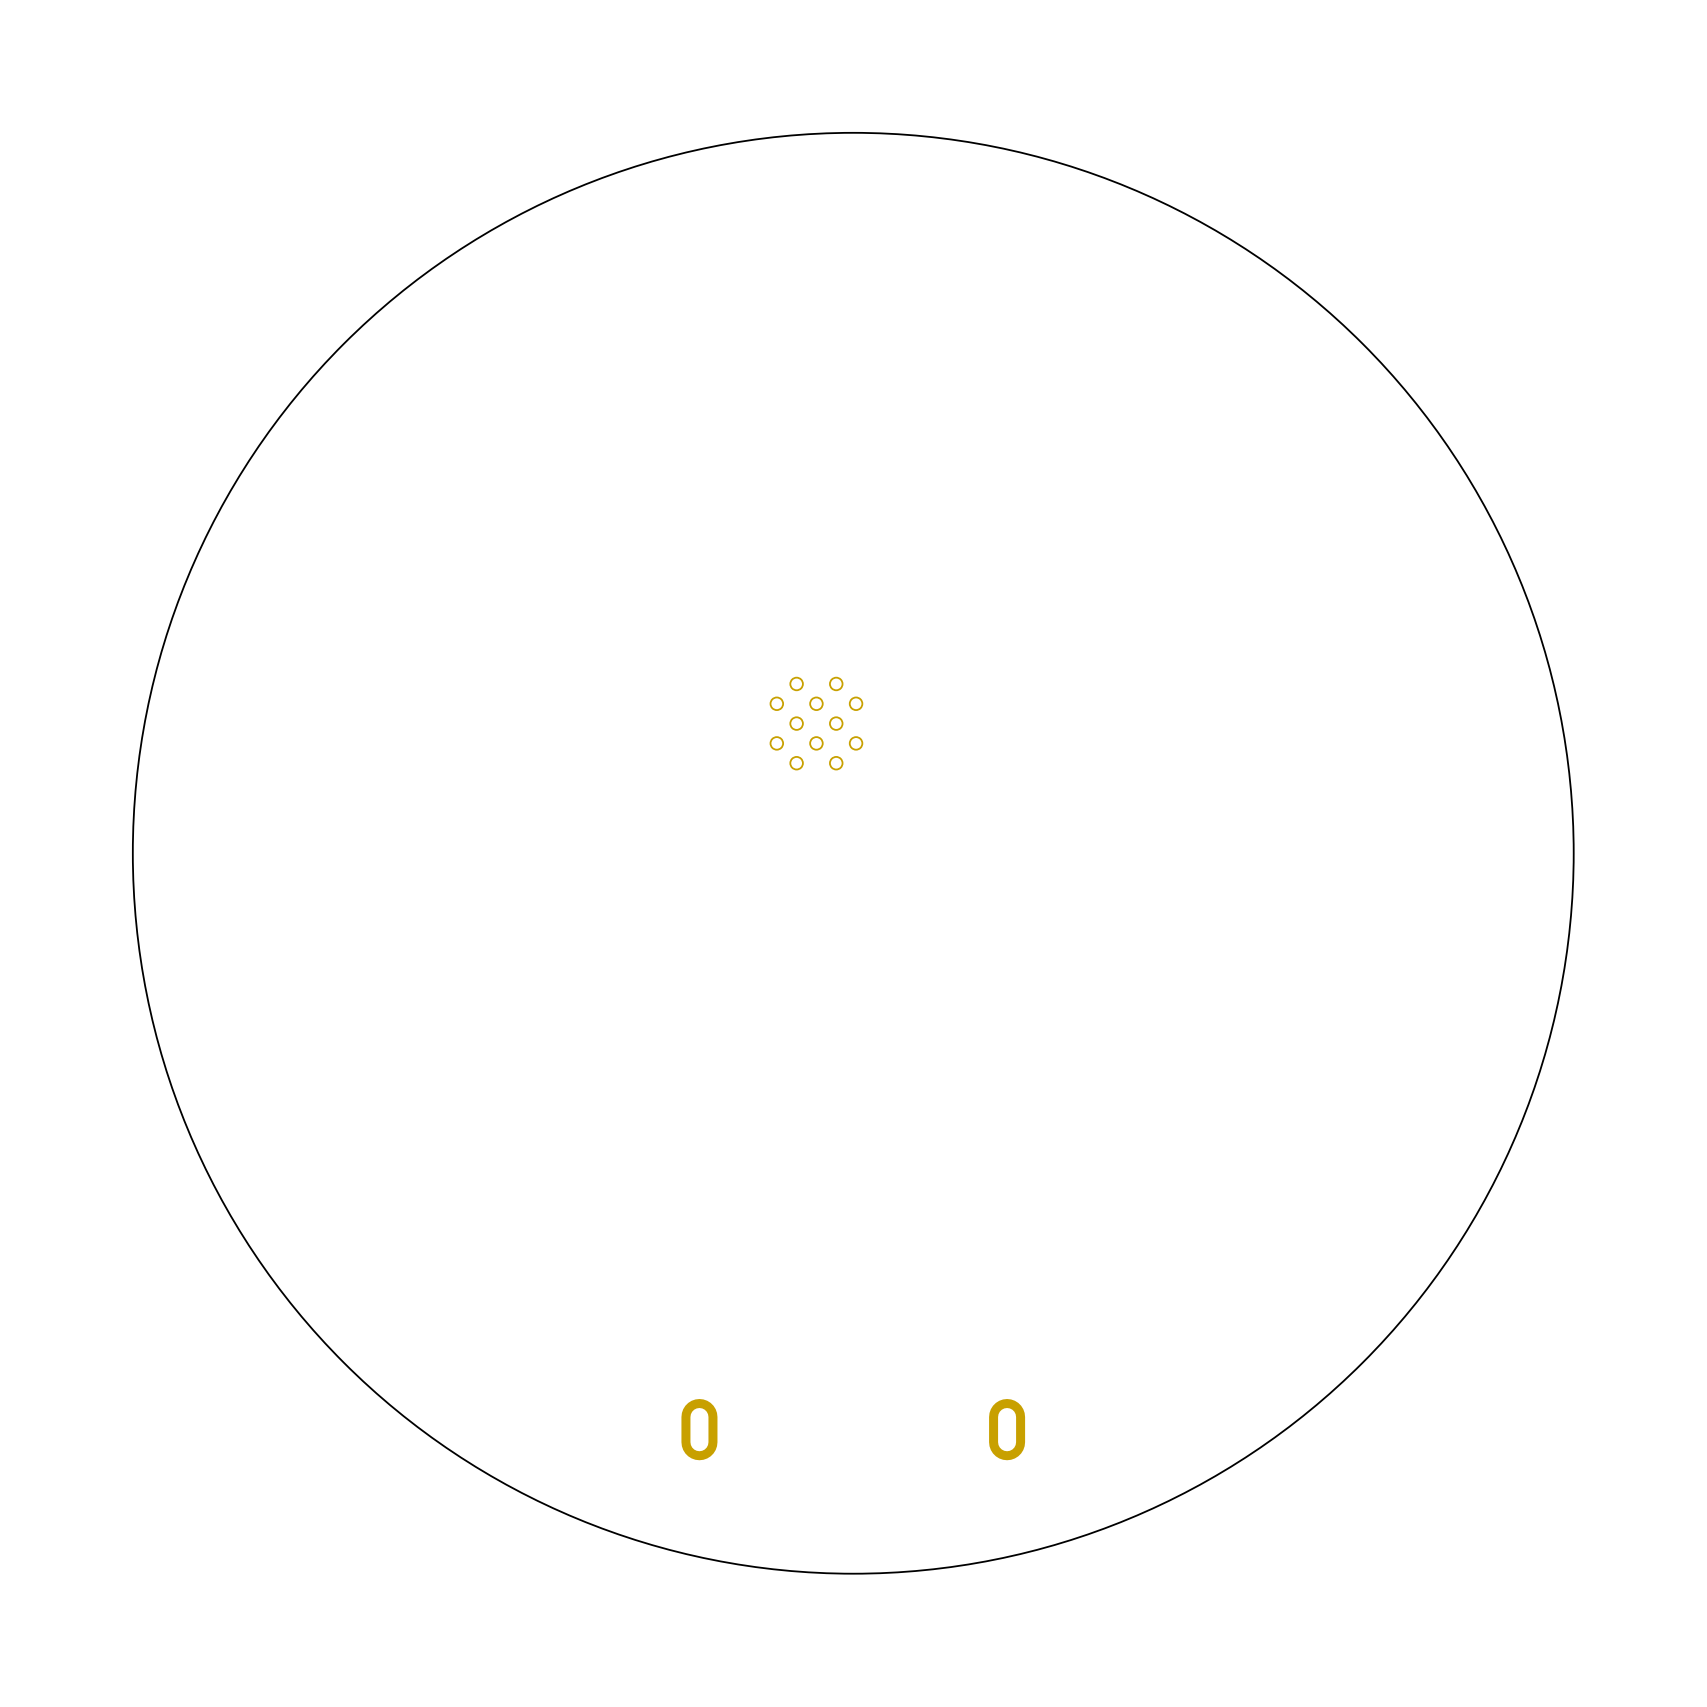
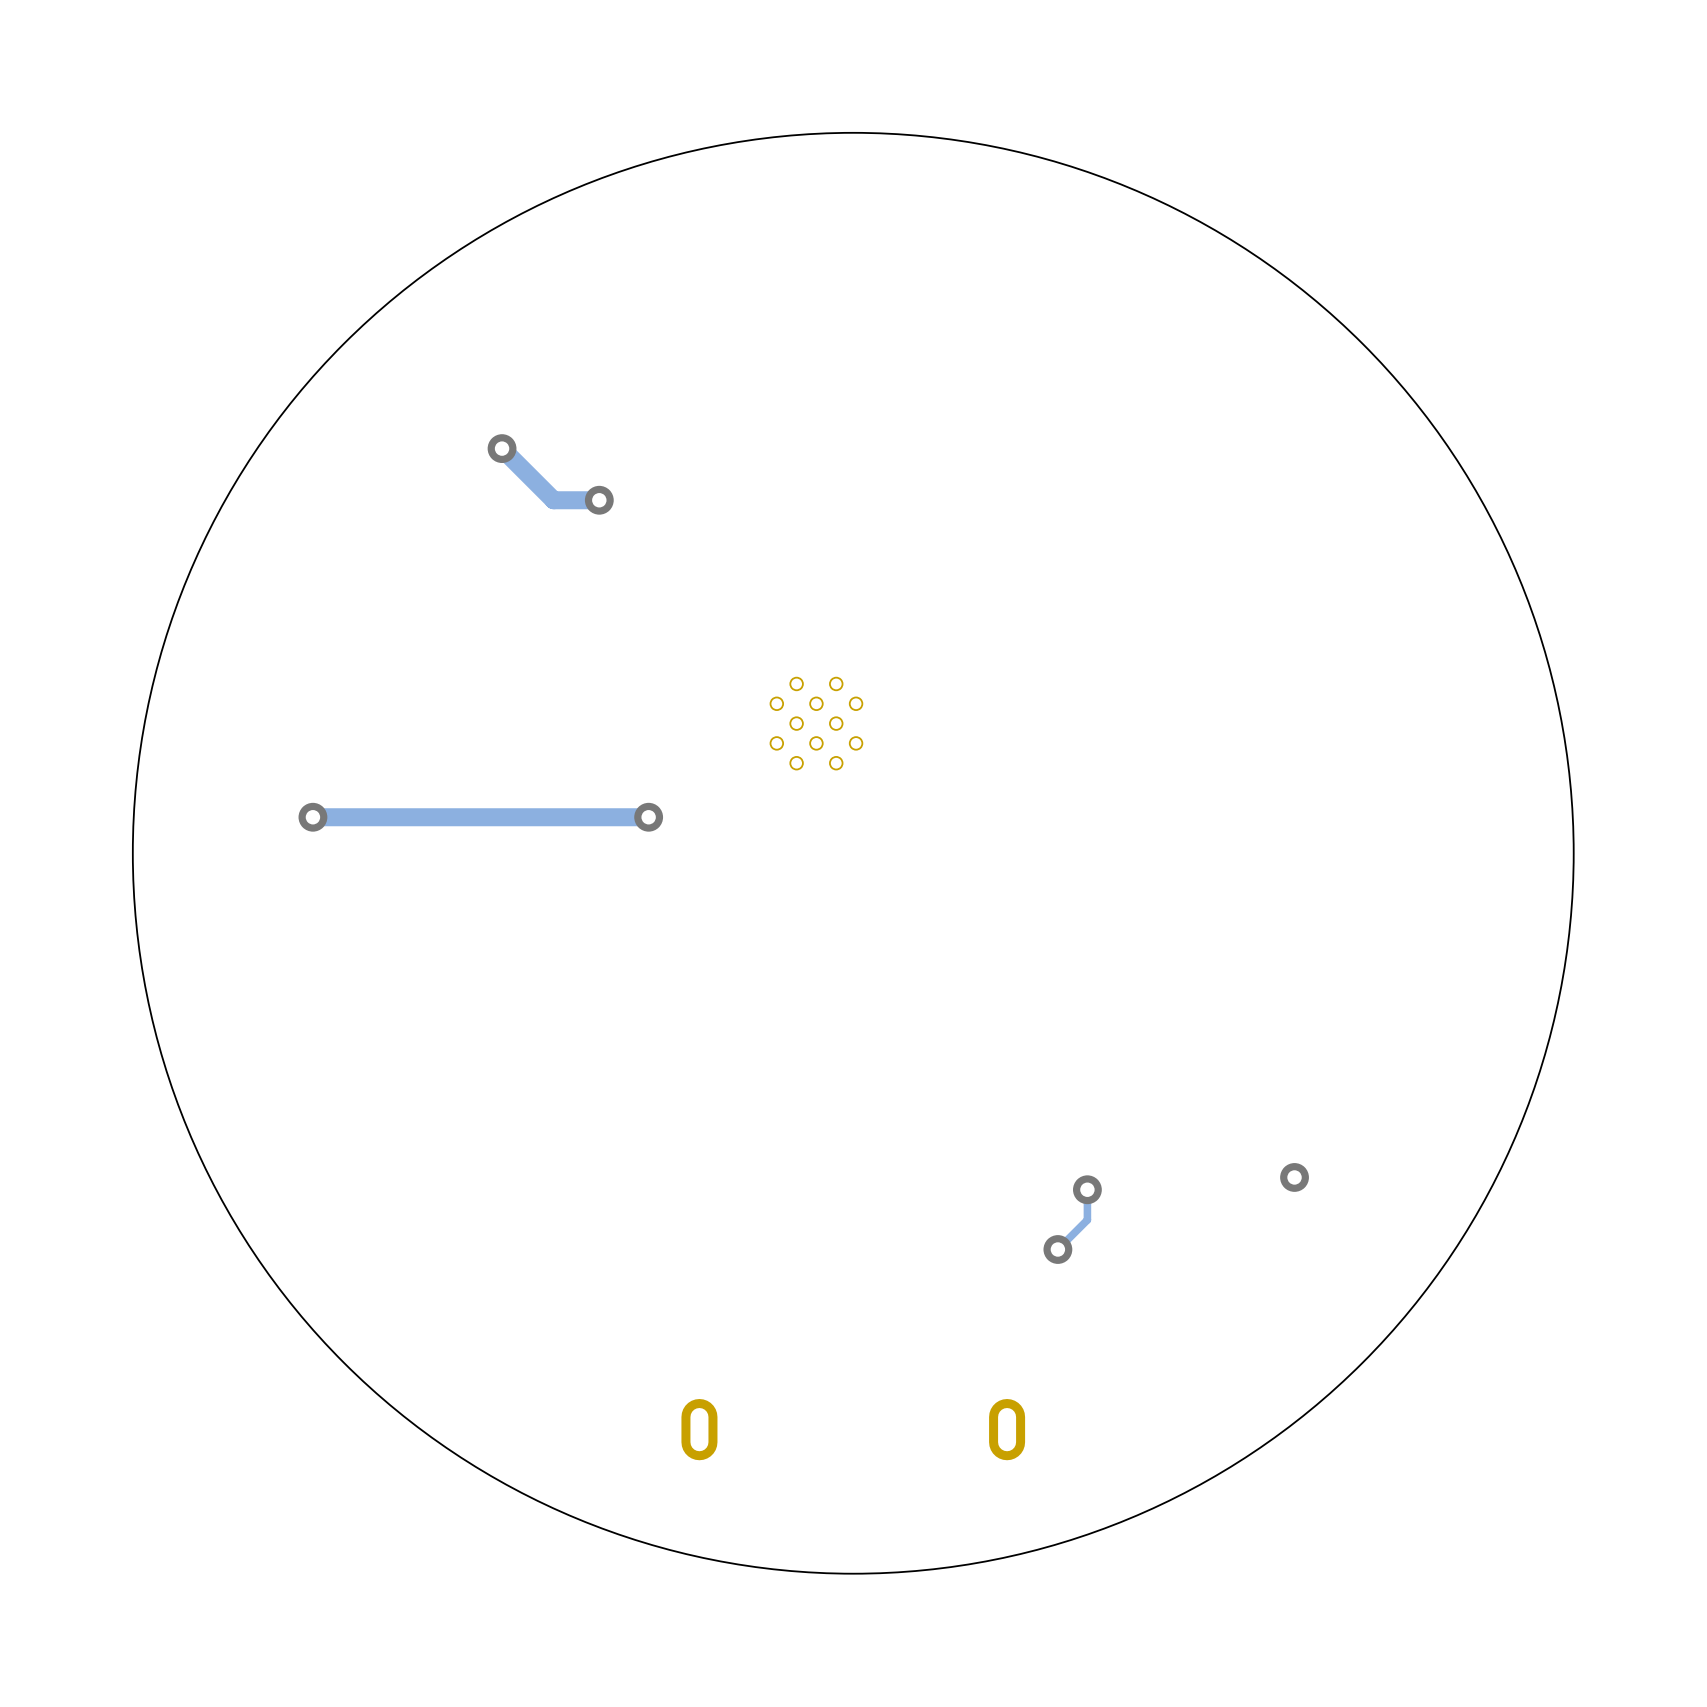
track: none -> (502, 448) (553, 500) (599, 500)
via: none -> (502, 448)
via: none -> (599, 500)
via: none -> (312, 817)
track: none -> (648, 817) (312, 817)
via: none -> (648, 817)
via: none -> (1294, 1177)
track: none -> (1087, 1189) (1087, 1219) (1057, 1249)
via: none -> (1087, 1189)
via: none -> (1057, 1249)

